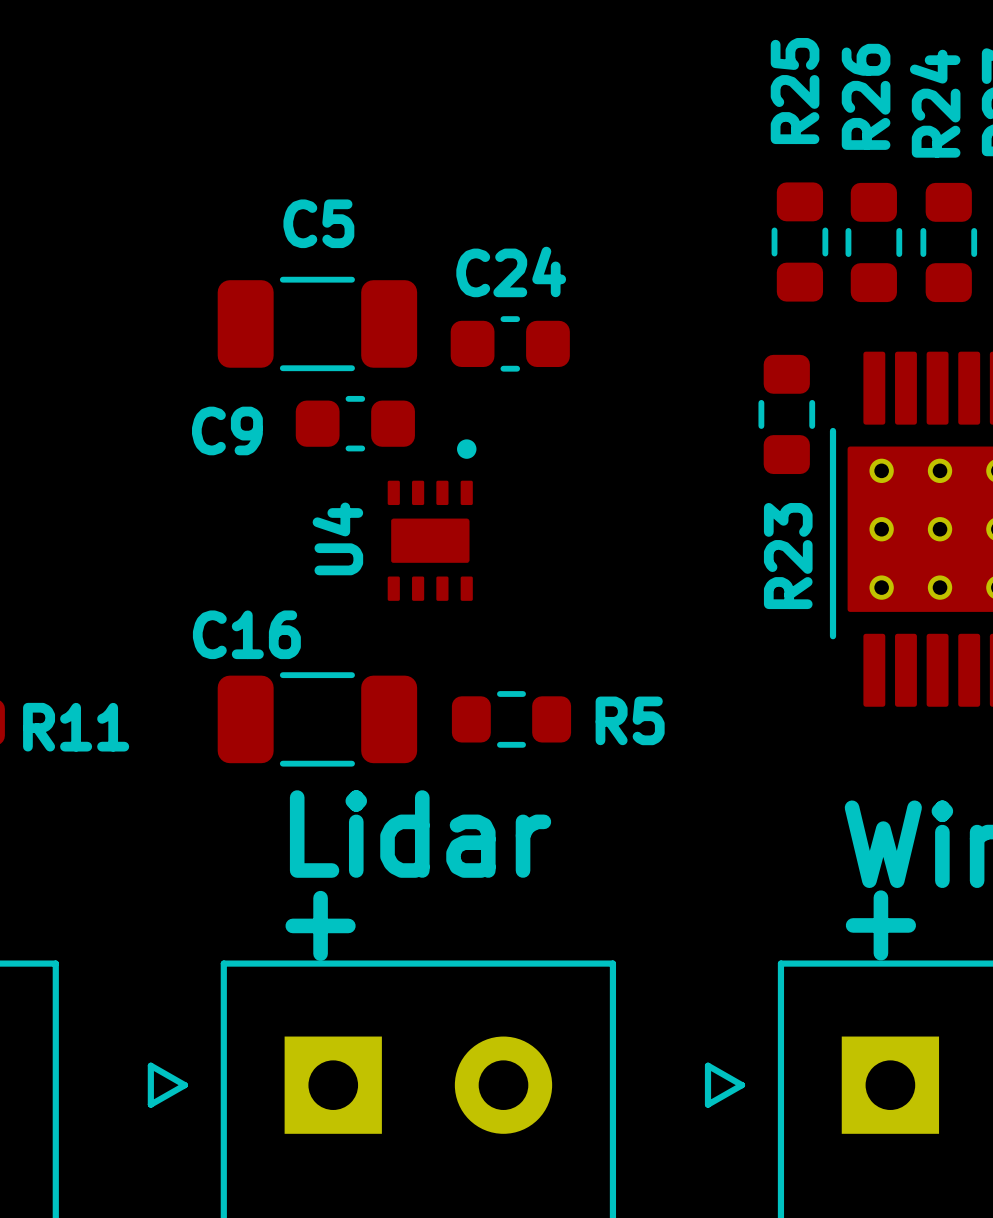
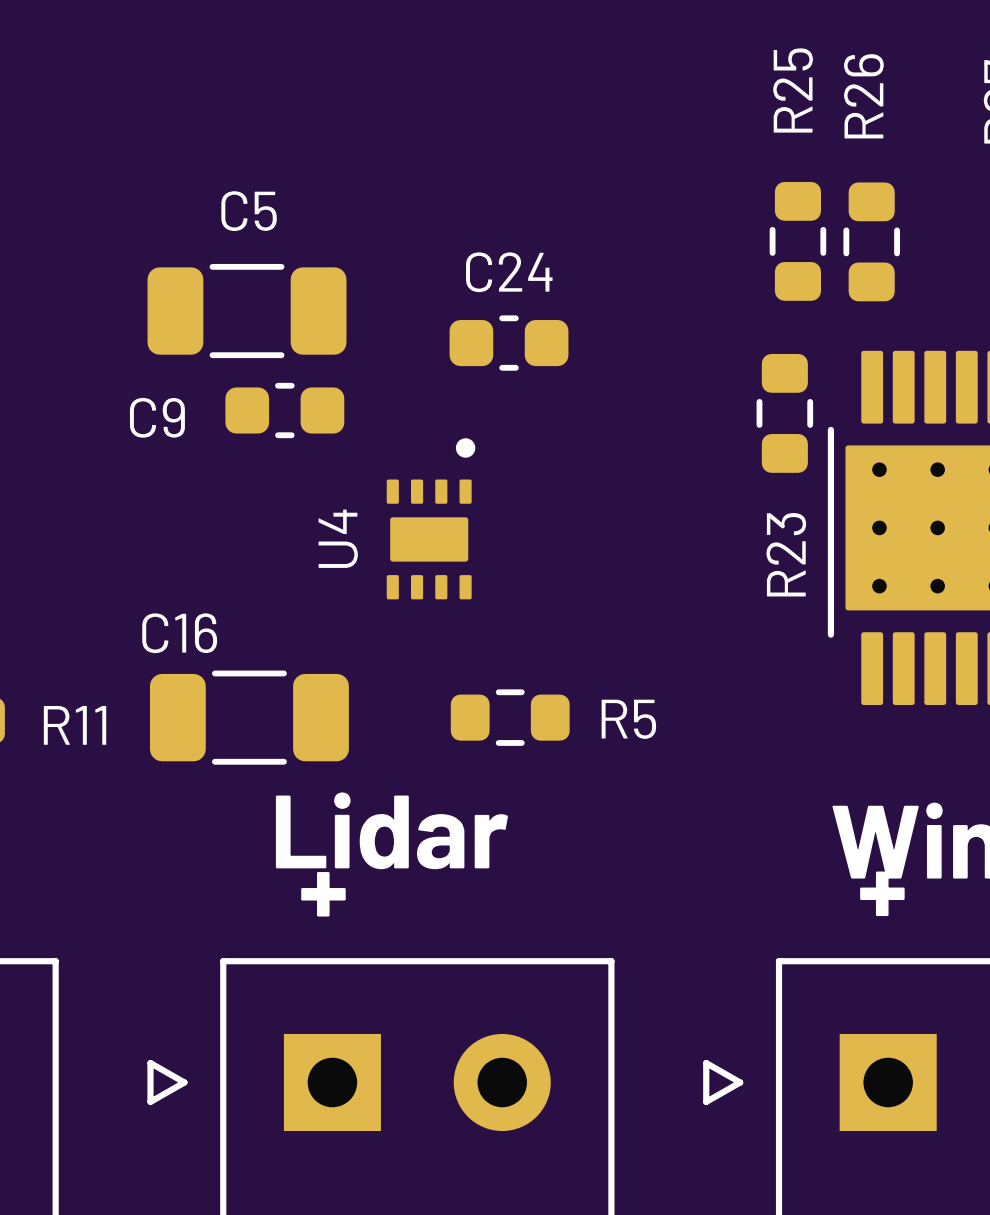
R24: (948, 242) -> none
C5 position: (317, 323) -> (247, 311)
C9 position: (355, 423) -> (284, 410)
C16 position: (317, 719) -> (249, 717)

